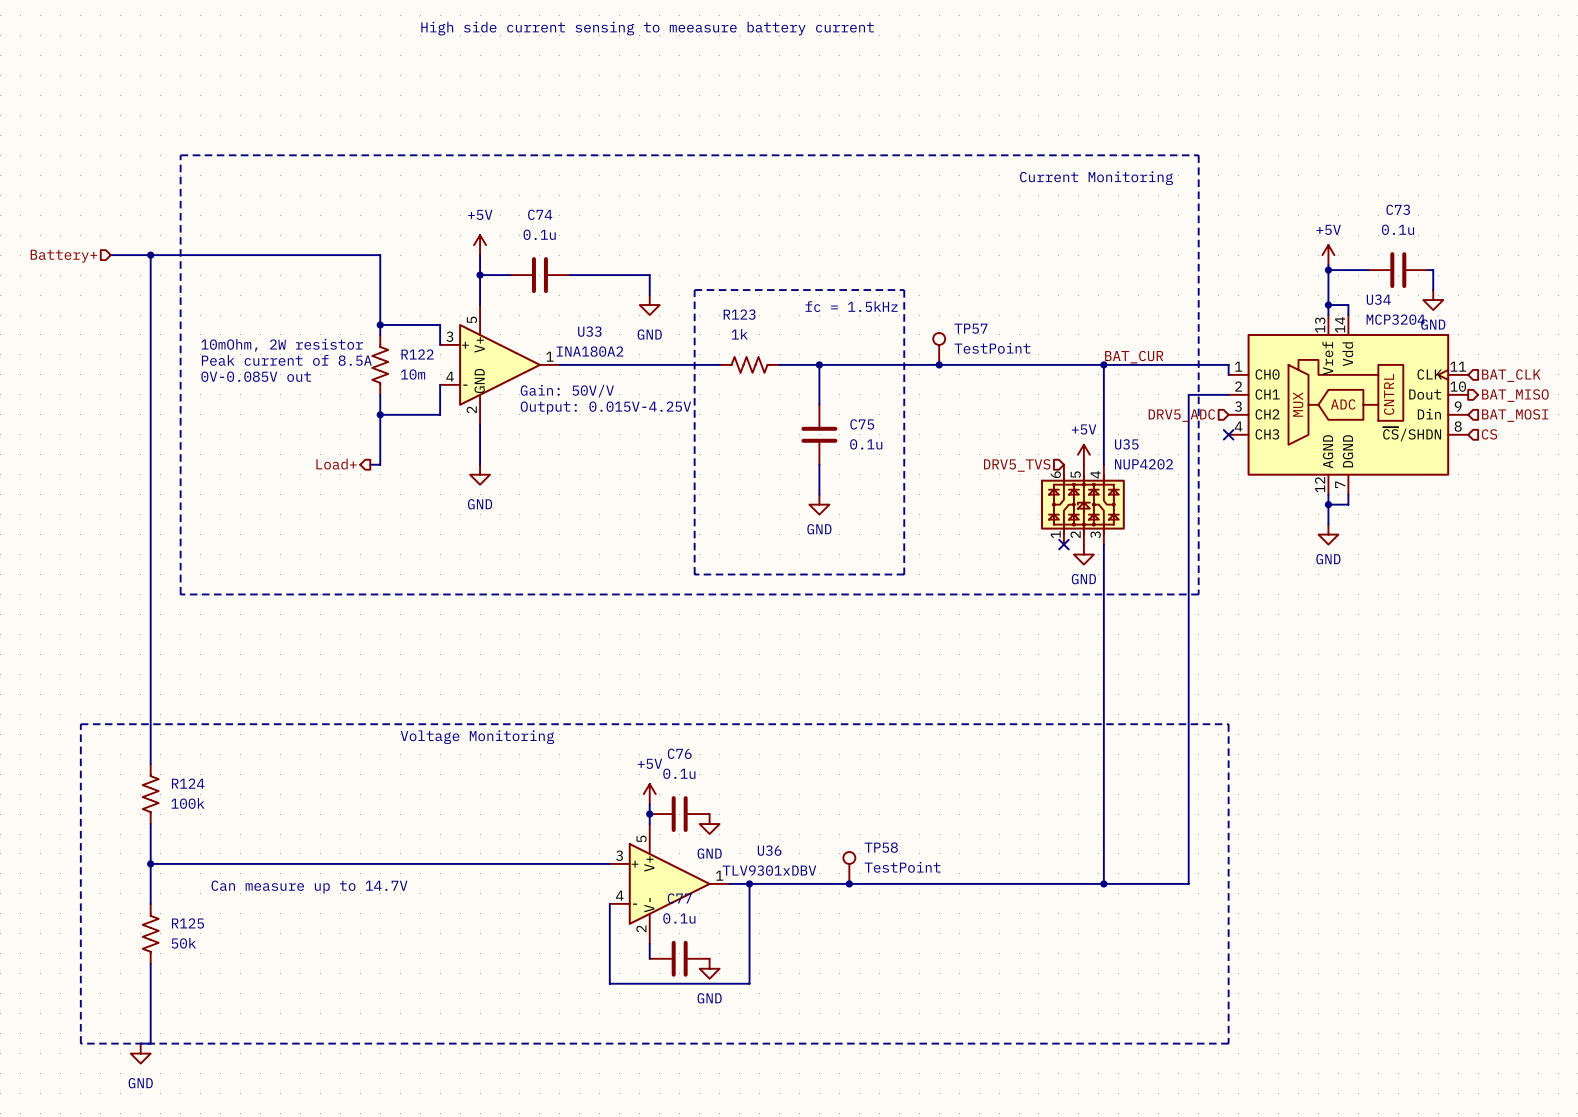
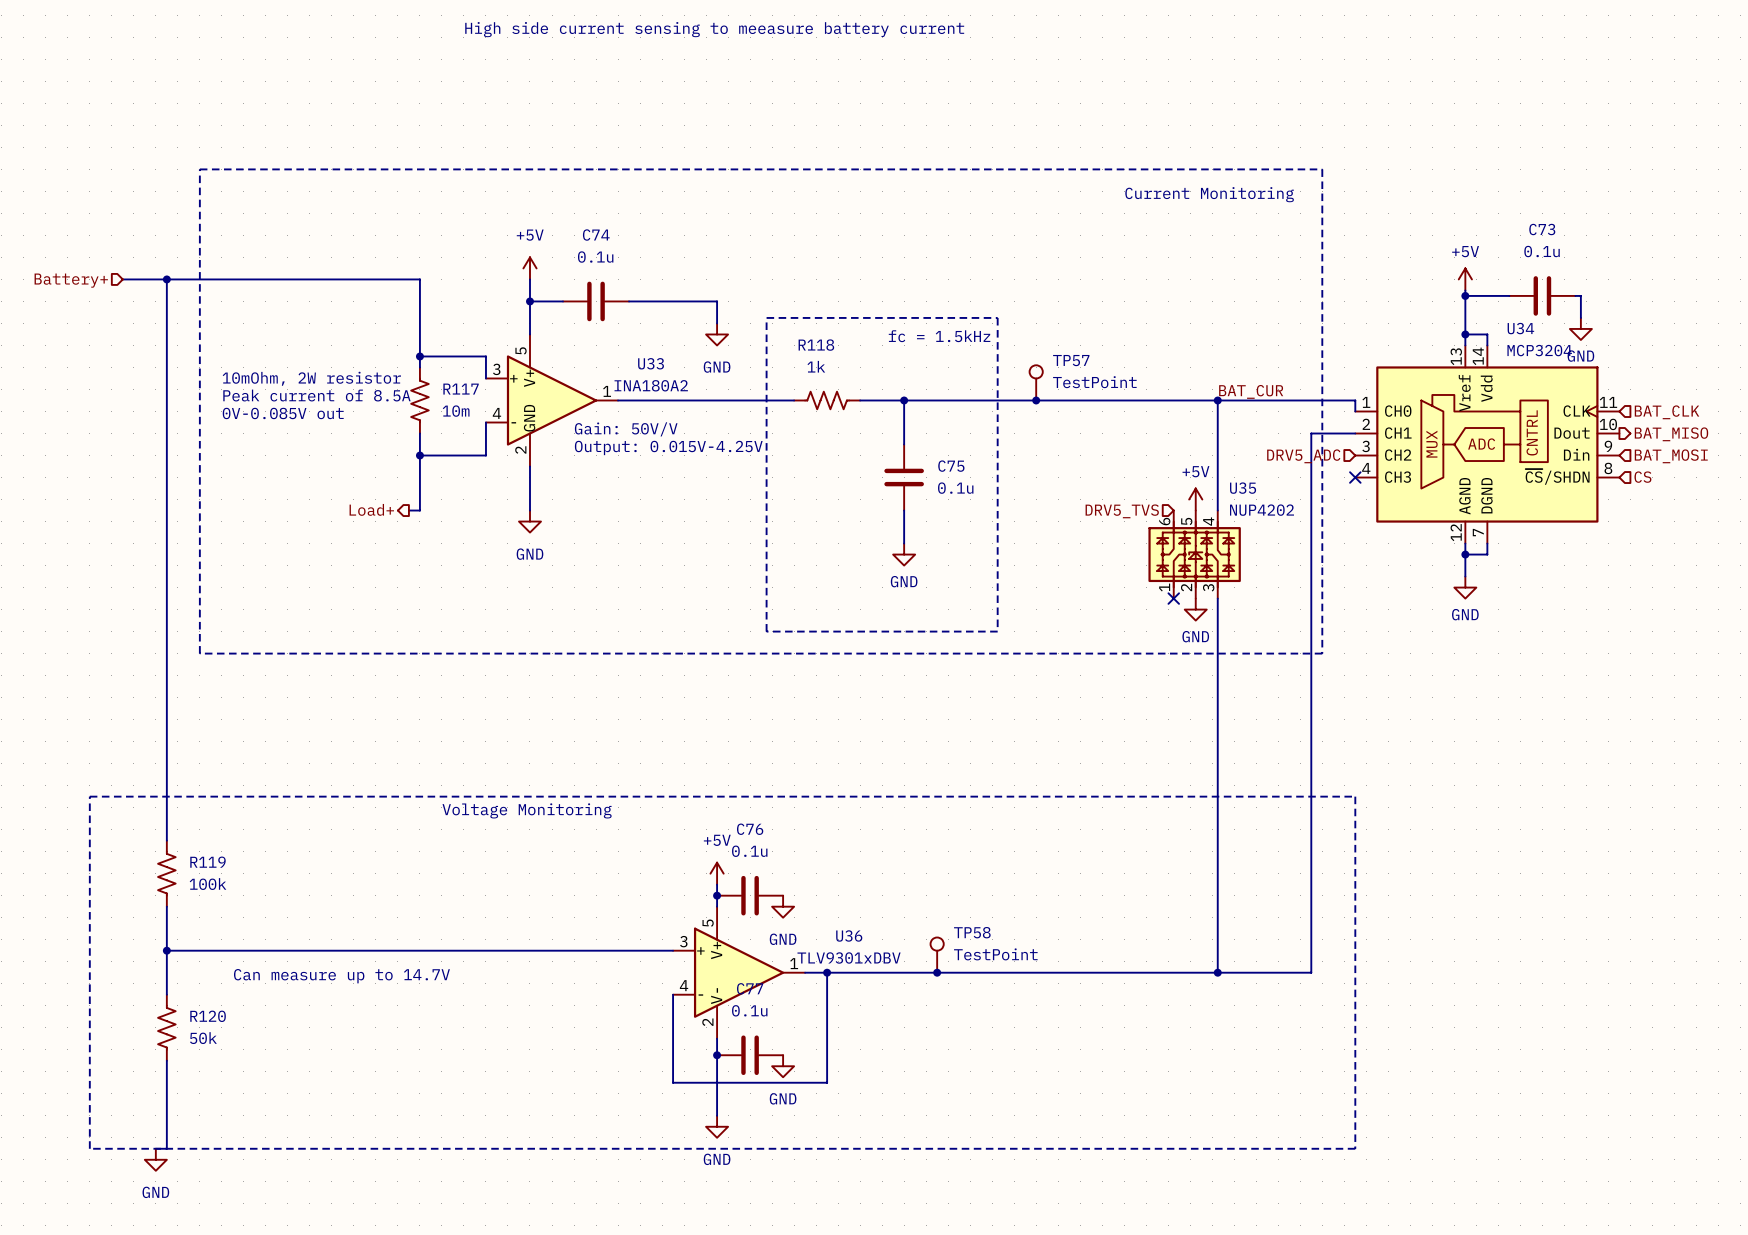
R123 name: R123 (739, 314) -> R118 (816, 345)
R122 name: R122 (417, 354) -> R117 (461, 389)
R124 name: R124 (188, 783) -> R119 (207, 862)
R125 name: R125 (187, 923) -> R120 (208, 1016)
wire: none -> (717, 1055) (717, 1115)
junction: none -> (717, 1055)
power symbol: none -> GND (717, 1126)

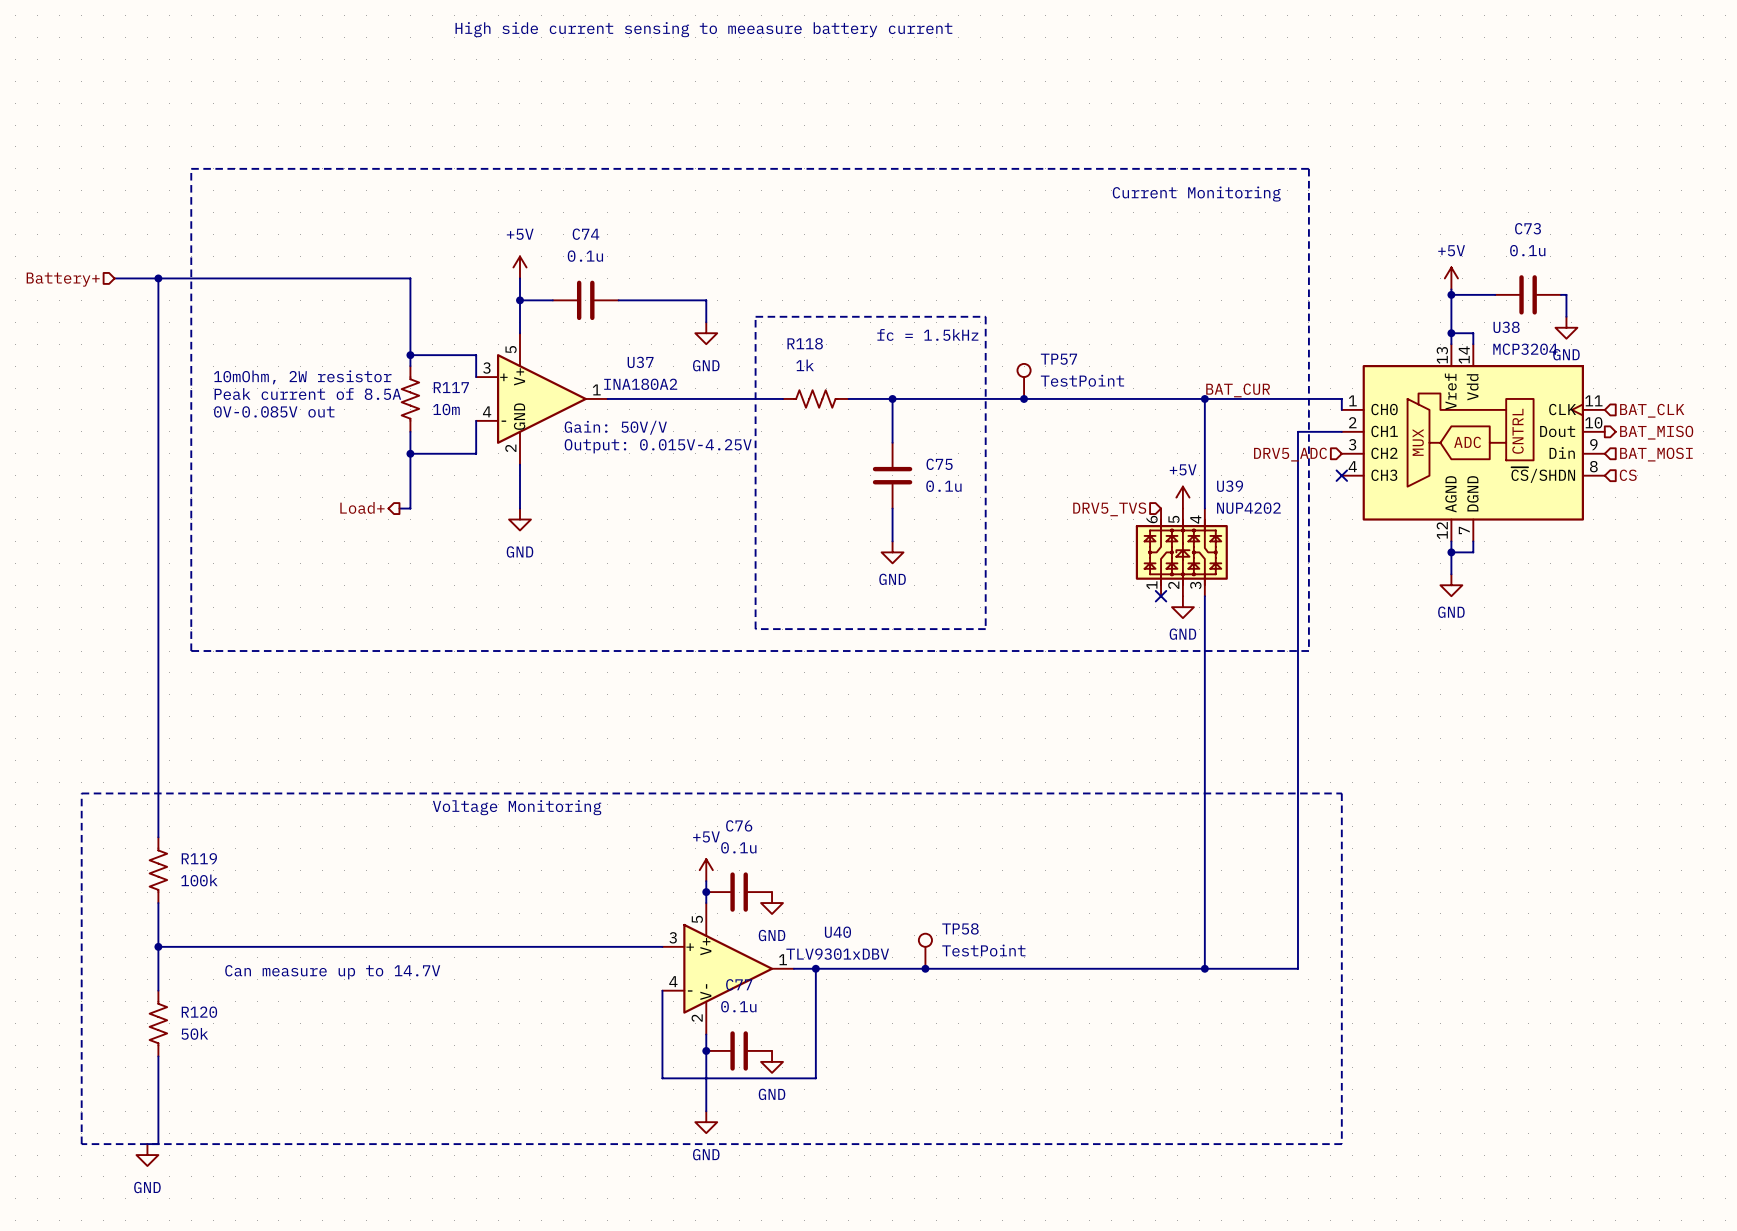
U34 name: U34 (1520, 328) -> U38 (1506, 327)
U33 name: U33 (651, 363) -> U37 (640, 362)
U35 name: U35 (1243, 488) -> U39 (1230, 486)
U36 name: U36 (849, 935) -> U40 (837, 932)

